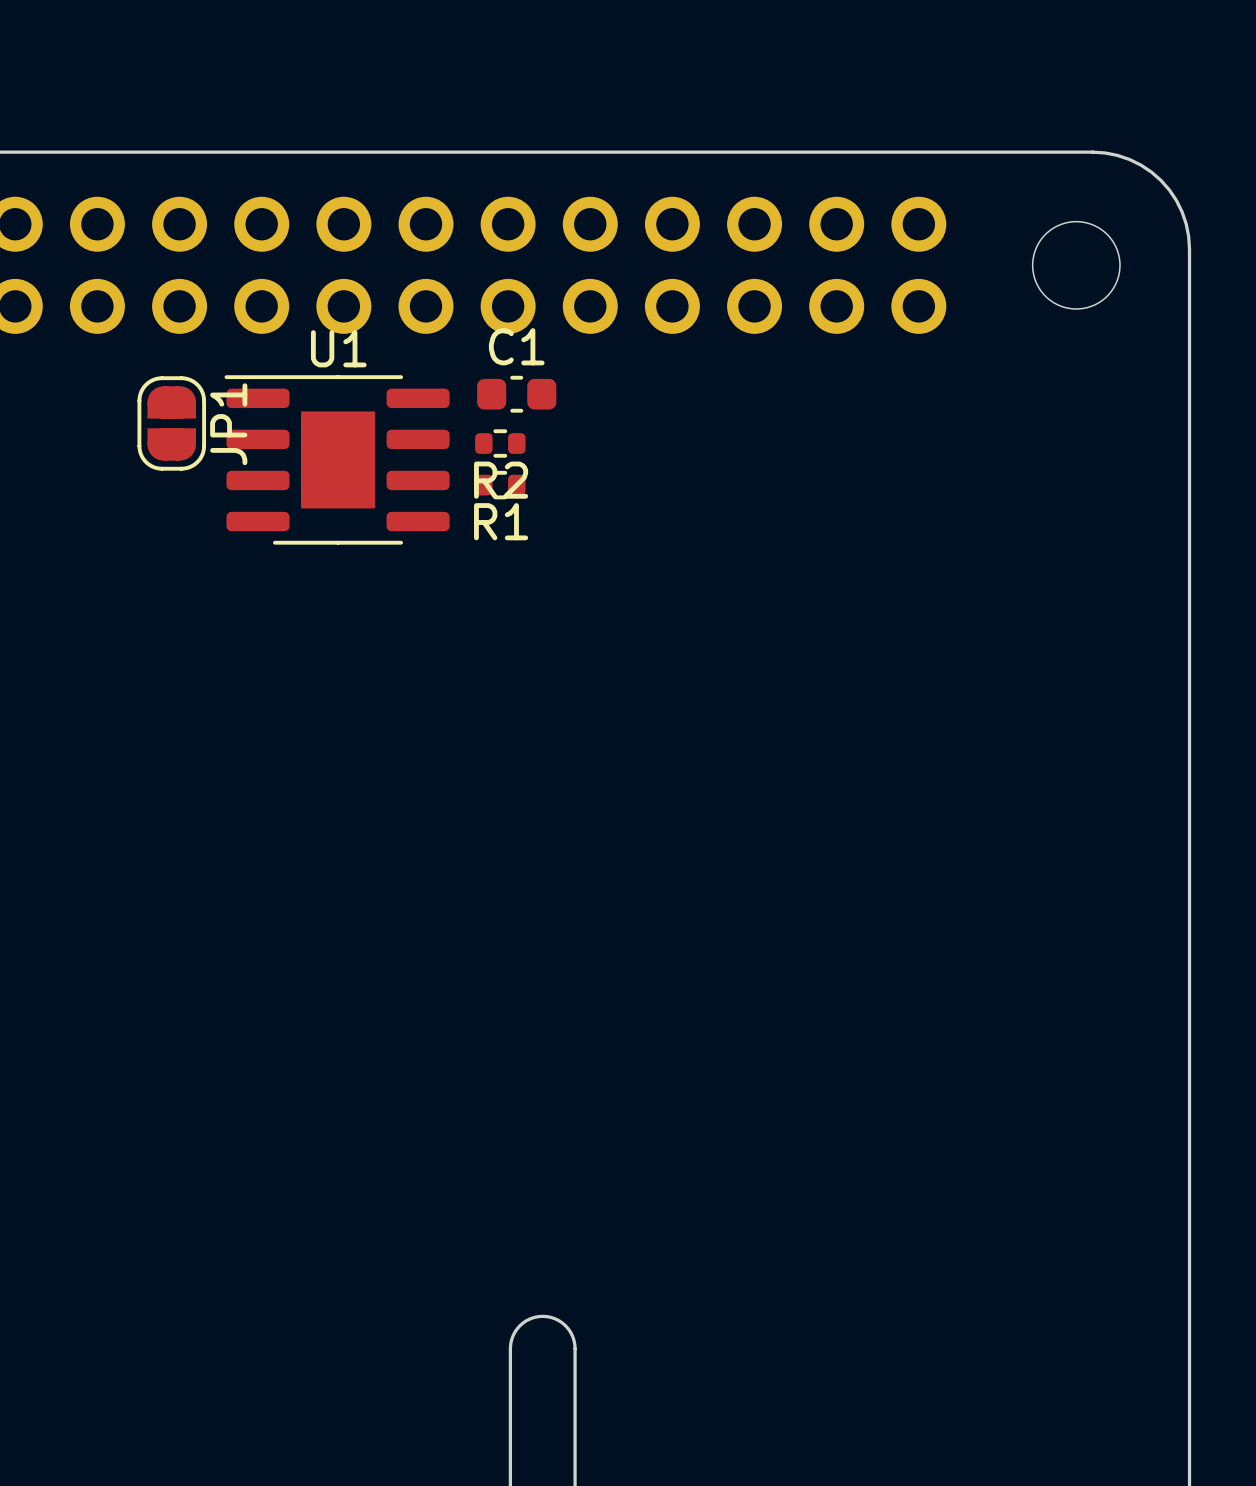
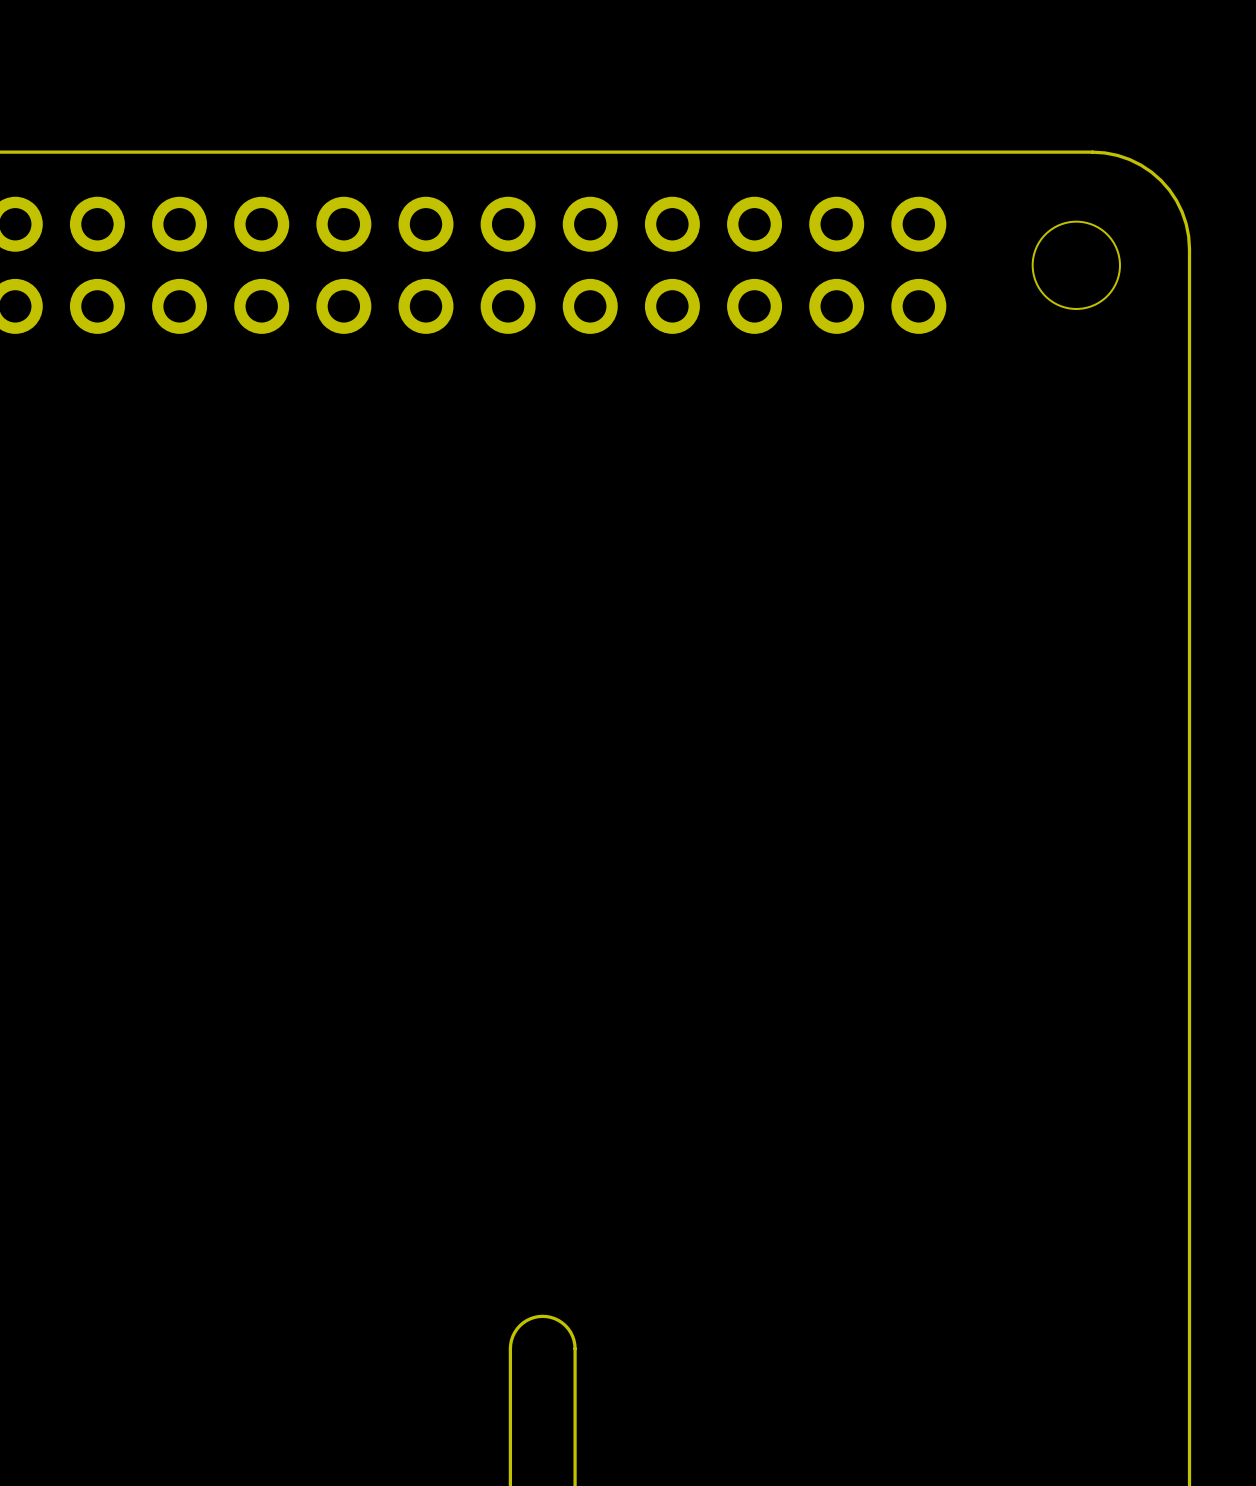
C1: (516, 394) -> none
JP1: (171, 423) -> none
R2: (500, 443) -> none
U1: (337, 459) -> none
R1: (500, 485) -> none

